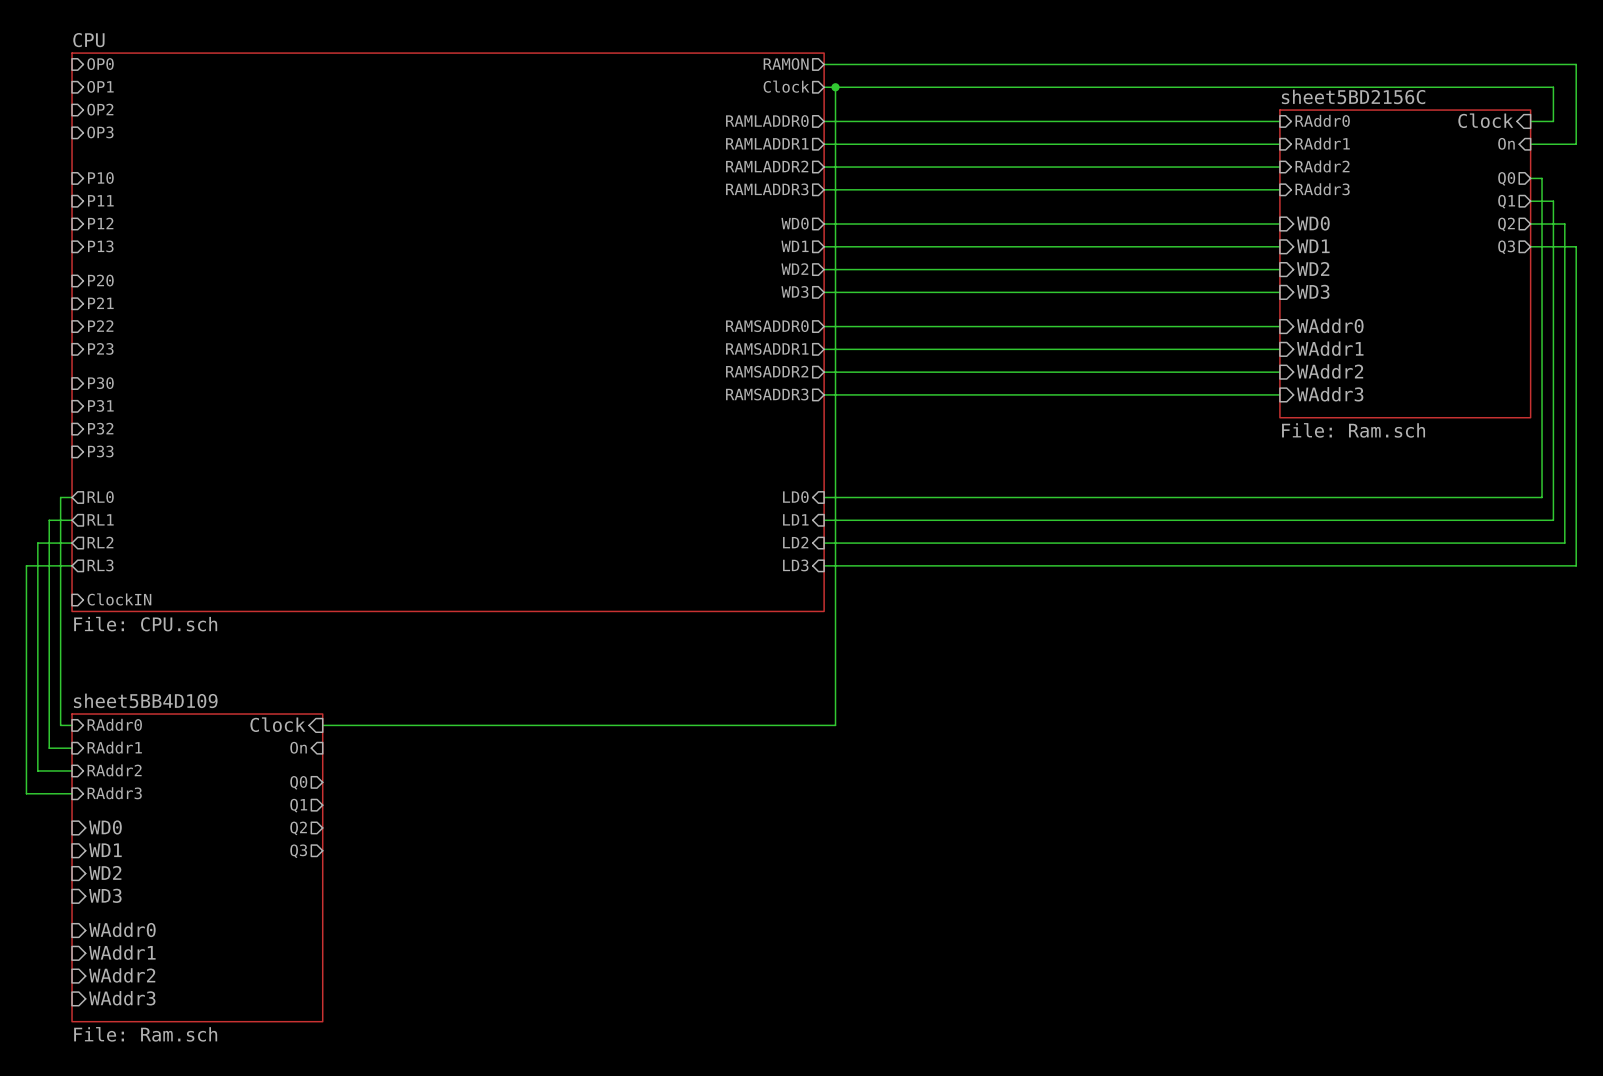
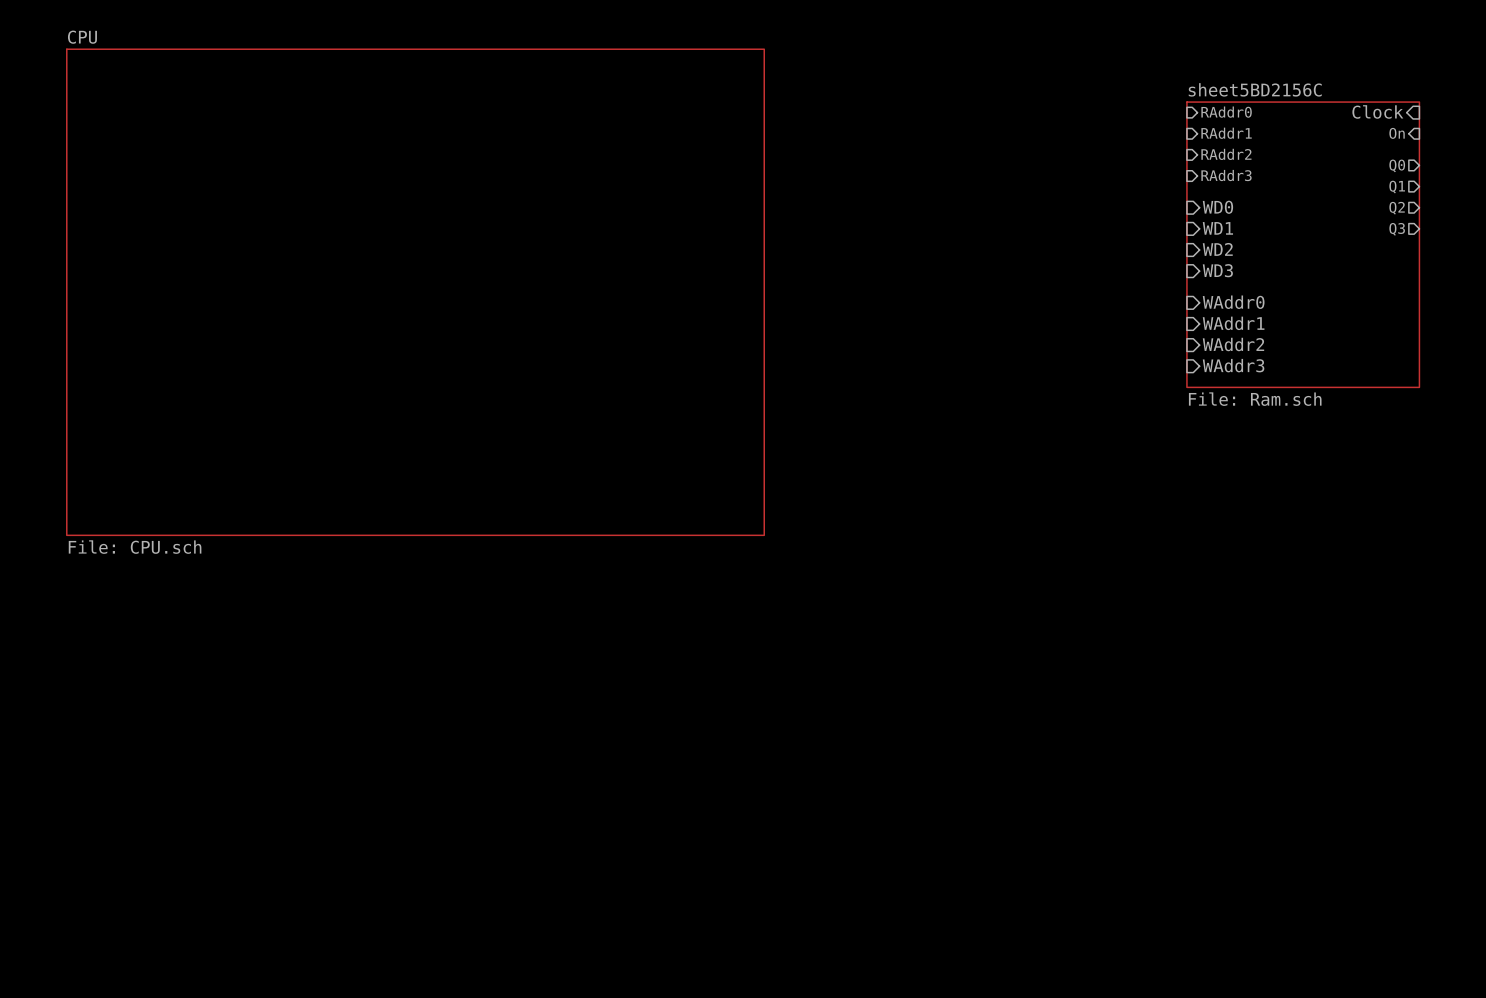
sheet pin: OP0 (100, 64) -> none
sheet pin: RAMON (786, 64) -> none
wire: (824, 64) (1576, 64) (1576, 144) (1530, 144) -> none
sheet pin: OP1 (100, 86) -> none
sheet pin: Clock (786, 86) -> none
wire: (824, 87) (1553, 87) (1553, 121) (1530, 121) -> none
wire: (835, 87) (835, 725) (322, 725) -> none
junction: (835, 87) -> none
sheet pin: OP2 (100, 109) -> none
sheet pin: RAMLADDR0 (767, 121) -> none
wire: (824, 121) (1279, 121) -> none
sheet pin: OP3 (100, 132) -> none
sheet pin: RAMLADDR1 (767, 143) -> none
wire: (824, 144) (1279, 144) -> none
sheet pin: RAMLADDR2 (767, 166) -> none
wire: (824, 167) (1279, 167) -> none
sheet pin: P10 (100, 178) -> none
wire: (1530, 178) (1542, 178) (1542, 497) (824, 497) -> none
sheet pin: RAMLADDR3 (767, 189) -> none
wire: (824, 189) (1279, 189) -> none
sheet pin: P11 (100, 200) -> none
wire: (1530, 201) (1553, 201) (1553, 520) (824, 520) -> none
sheet pin: P12 (100, 223) -> none
sheet pin: WD0 (795, 223) -> none
wire: (824, 224) (1279, 224) -> none
wire: (1530, 224) (1564, 224) (1564, 543) (824, 543) -> none
sheet pin: P13 (100, 246) -> none
sheet pin: WD1 (794, 246) -> none
wire: (824, 246) (1279, 246) -> none
wire: (1530, 246) (1576, 246) (1576, 565) (824, 565) -> none
sheet pin: WD2 (794, 269) -> none
wire: (824, 269) (1279, 269) -> none
sheet pin: P20 (100, 280) -> none
sheet pin: WD3 (794, 291) -> none
wire: (824, 292) (1279, 292) -> none
sheet pin: P21 (100, 303) -> none
sheet CPU: none -> File: CPU.sch (415, 292)
sheet pin: P22 (100, 326) -> none
sheet pin: RAMSADDR0 (767, 326) -> none
wire: (824, 326) (1279, 326) -> none
sheet CPU: File: CPU.sch (448, 332) -> none
sheet pin: P23 (100, 348) -> none
sheet pin: RAMSADDR1 (767, 348) -> none
wire: (824, 349) (1279, 349) -> none
sheet pin: RAMSADDR2 (767, 371) -> none
wire: (824, 372) (1279, 372) -> none
sheet pin: P30 (100, 383) -> none
sheet pin: RAMSADDR3 (767, 394) -> none
wire: (824, 394) (1279, 394) -> none
sheet pin: P31 (100, 405) -> none
sheet pin: P32 (100, 428) -> none
sheet pin: P33 (100, 451) -> none
wire: (72, 497) (60, 497) (60, 725) (72, 725) -> none
sheet pin: RL0 (100, 497) -> none
sheet pin: LD0 (795, 497) -> none
sheet pin: RL1 (100, 519) -> none
sheet pin: LD1 (795, 519) -> none
wire: (72, 520) (49, 520) (49, 748) (72, 748) -> none
sheet pin: RL2 (100, 542) -> none
sheet pin: LD2 (795, 542) -> none
wire: (72, 543) (37, 543) (37, 770) (72, 770) -> none
wire: (72, 565) (26, 565) (26, 793) (72, 793) -> none
sheet pin: RL3 (100, 565) -> none
sheet pin: LD3 (795, 565) -> none
sheet pin: ClockIN (119, 599) -> none
sheet pin: RAddr0 (114, 724) -> none
sheet pin: Clock (277, 724) -> none
sheet pin: RAddr1 (114, 747) -> none
sheet pin: On (298, 747) -> none
sheet pin: RAddr2 (114, 770) -> none
sheet pin: Q0 (298, 782) -> none
sheet pin: RAddr3 (114, 793) -> none
sheet pin: Q1 (298, 805) -> none
sheet pin: WD0 (105, 827) -> none
sheet pin: Q2 (298, 828) -> none
sheet pin: WD1 (105, 850) -> none
sheet pin: Q3 (298, 851) -> none
sheet sheet5BB4D109: File: Ram.sch (197, 867) -> none
sheet pin: WD2 (105, 872) -> none
sheet pin: WD3 (105, 895) -> none
sheet pin: WAddr0 (122, 929) -> none
sheet pin: WAddr1 (122, 952) -> none
sheet pin: WAddr2 (122, 975) -> none
sheet pin: WAddr3 (122, 998) -> none

